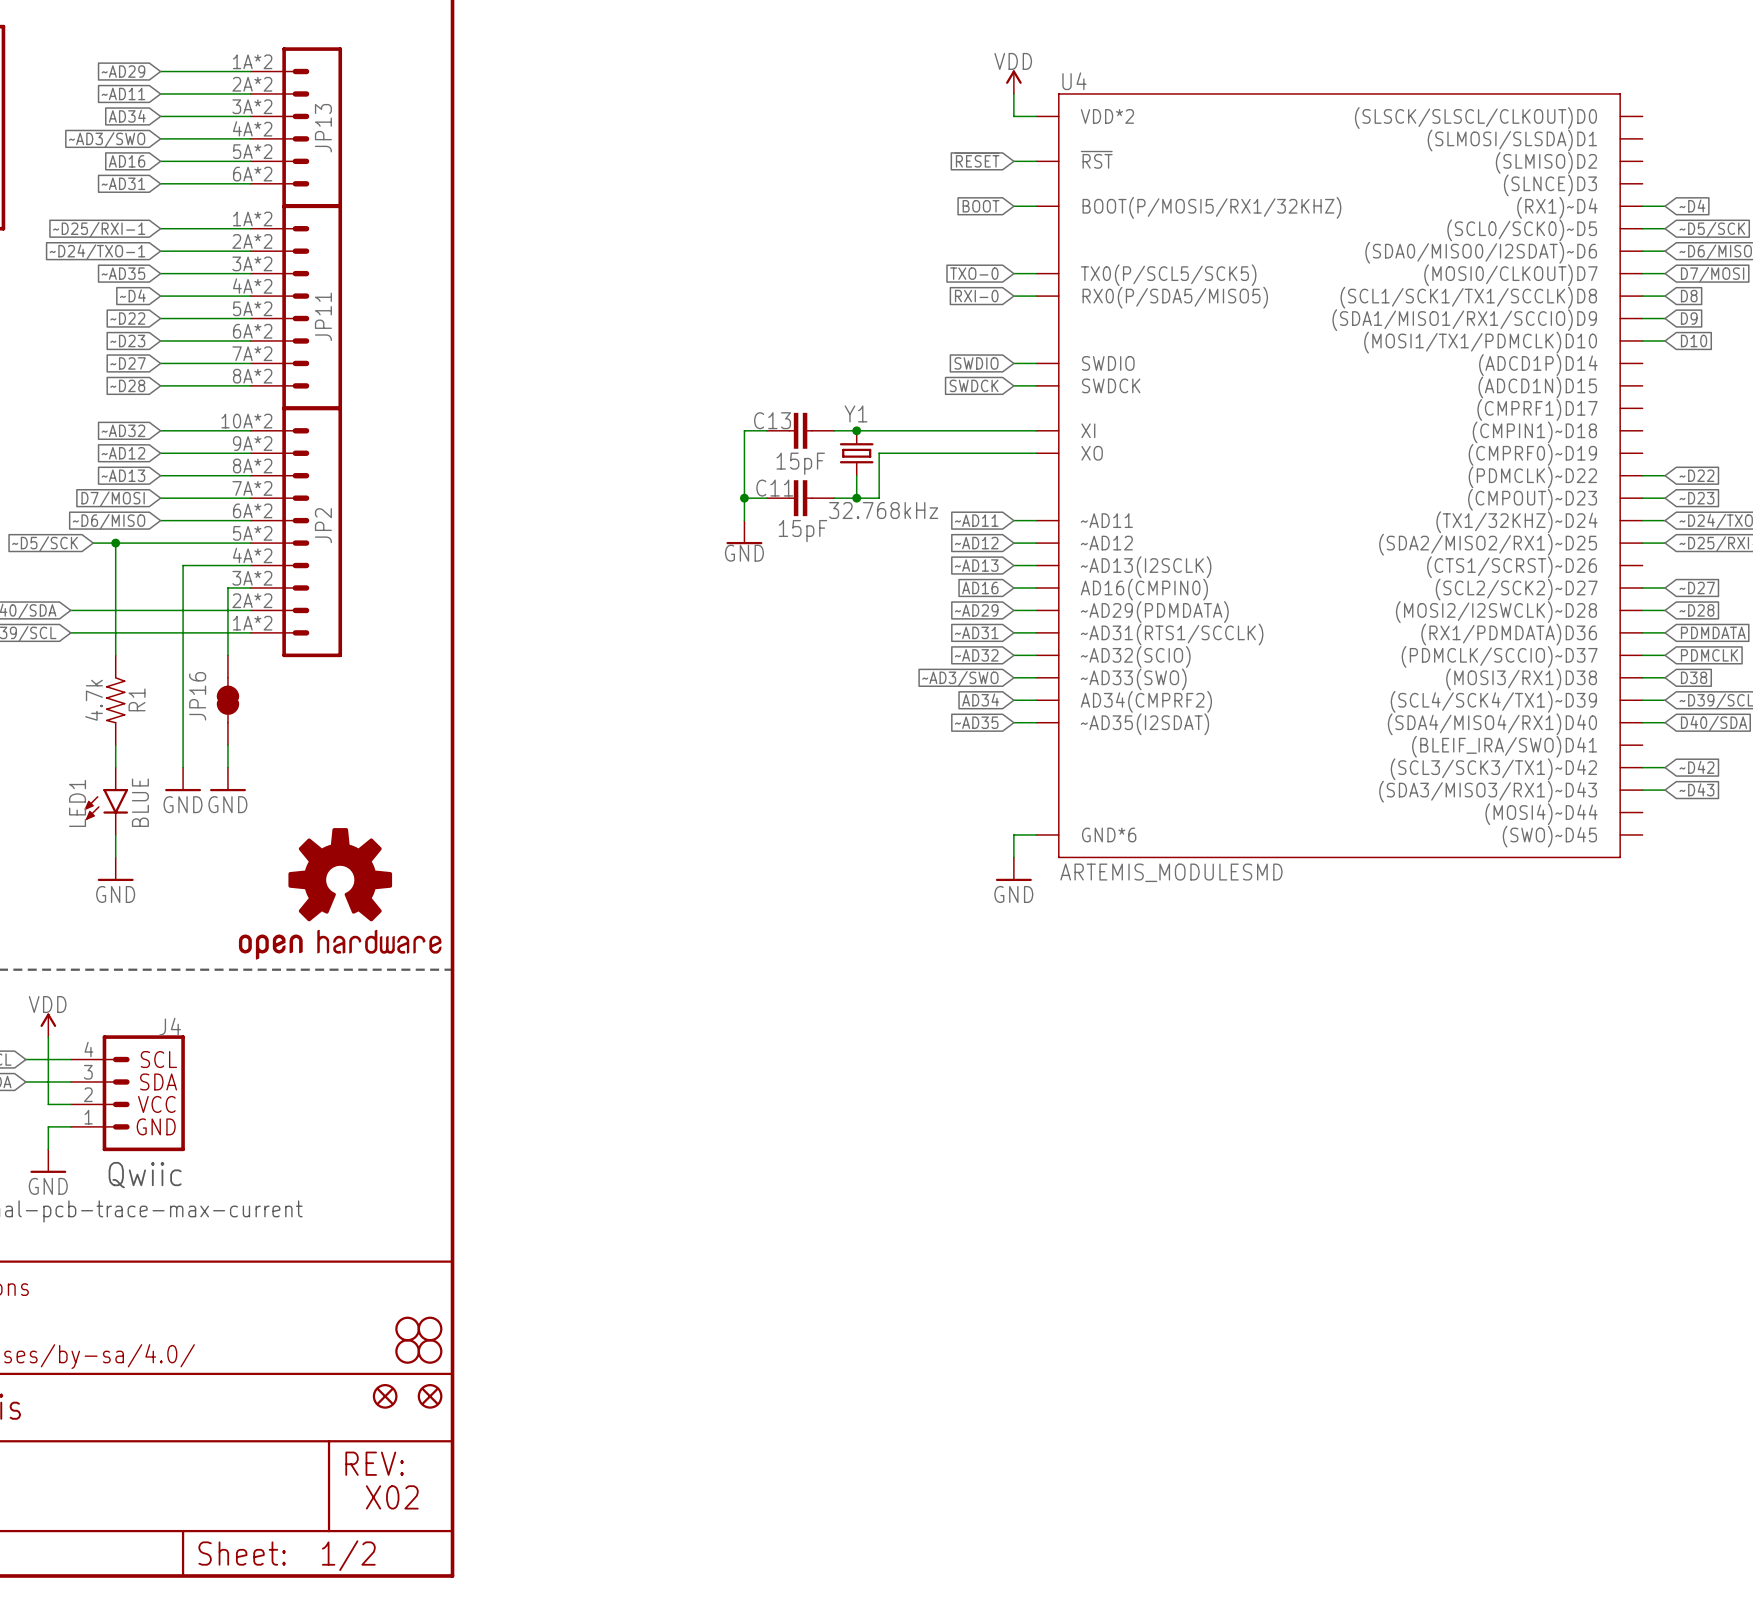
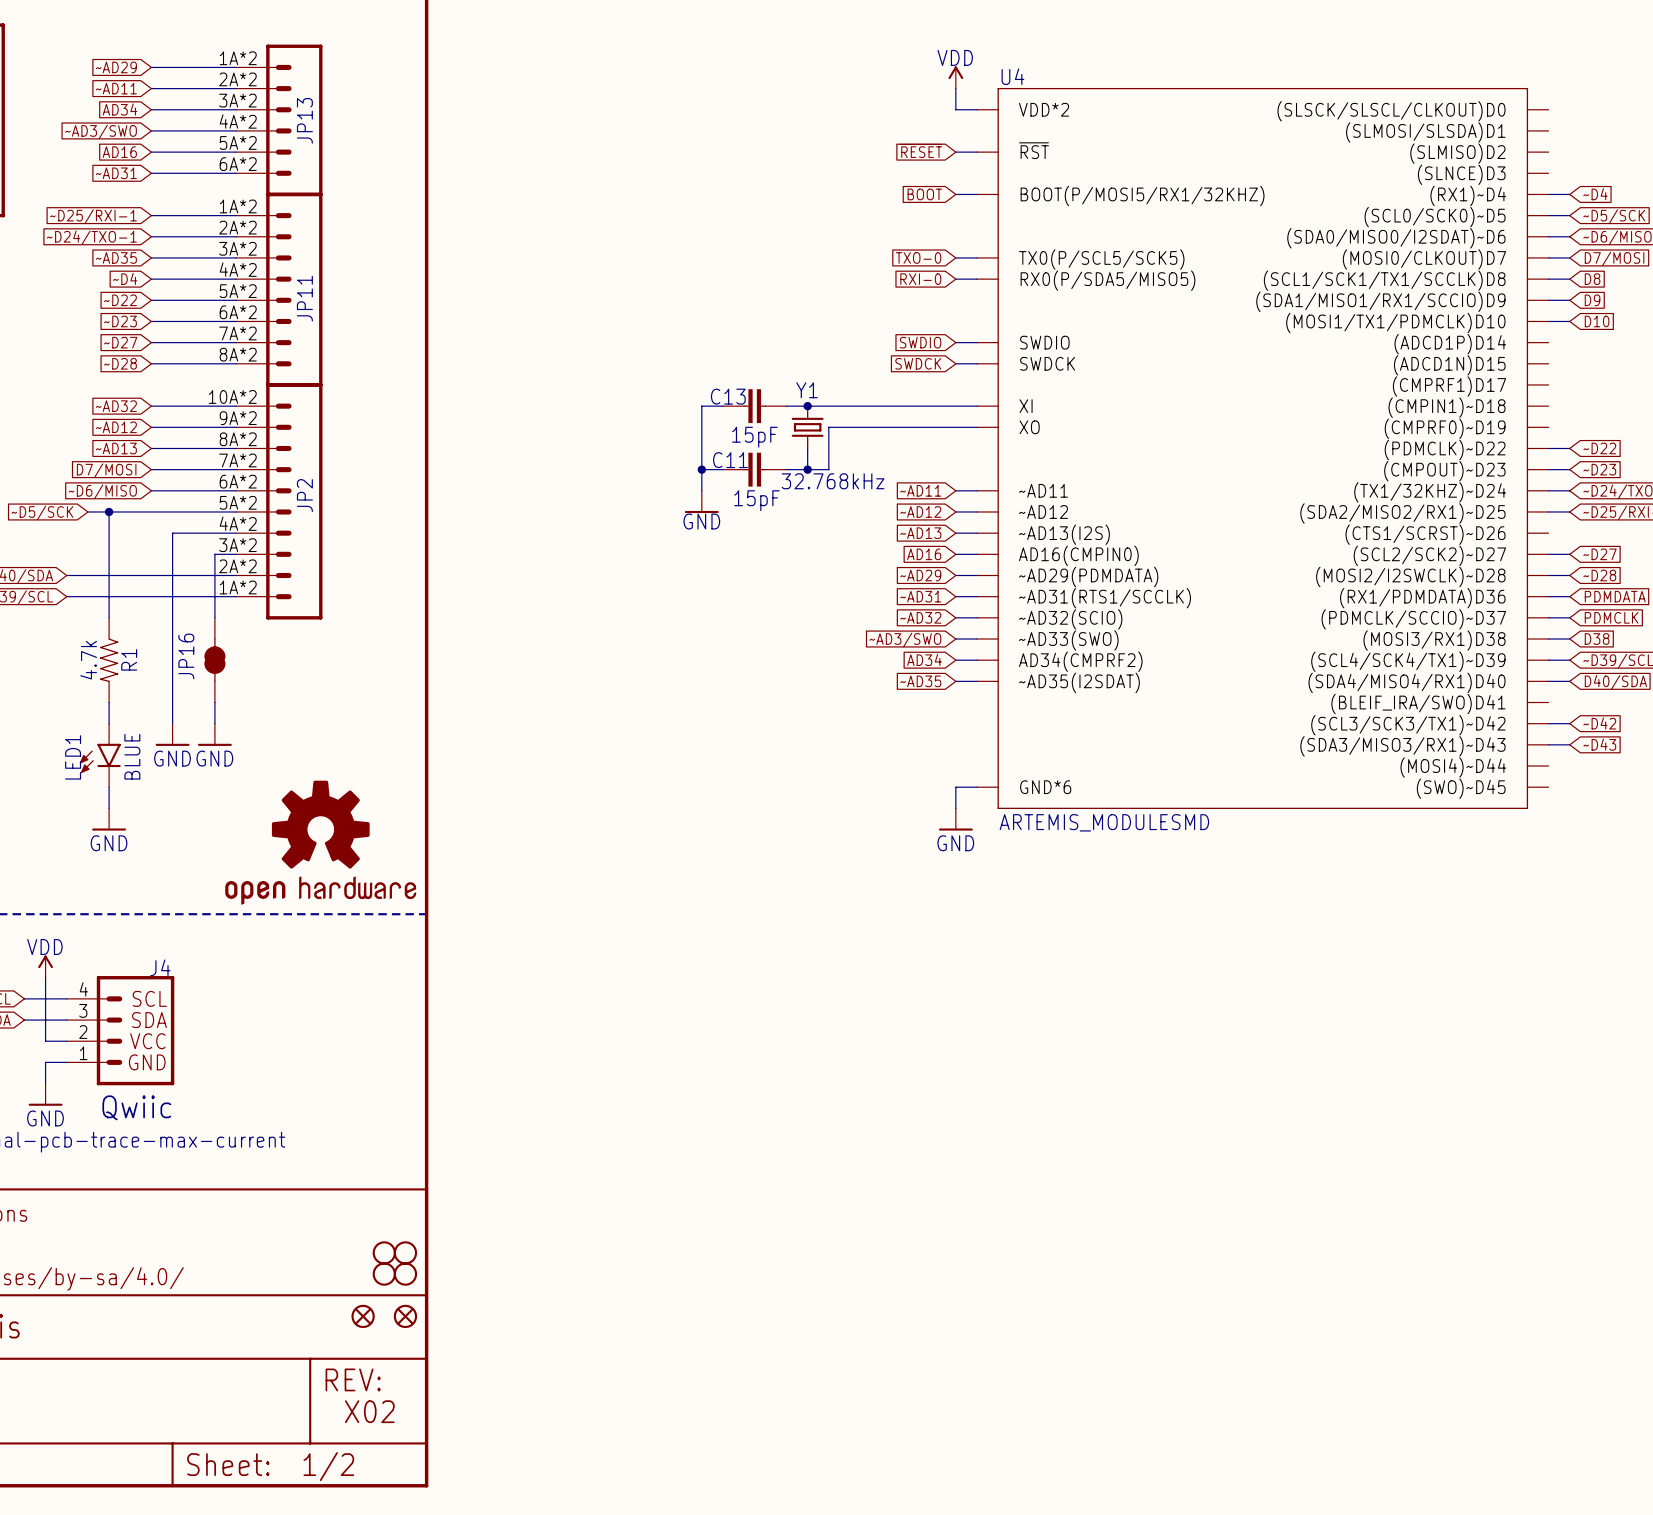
U4 pin name: ~AD13(I2SCLK) (1146, 567) -> ~AD13(I2S) (1064, 534)

